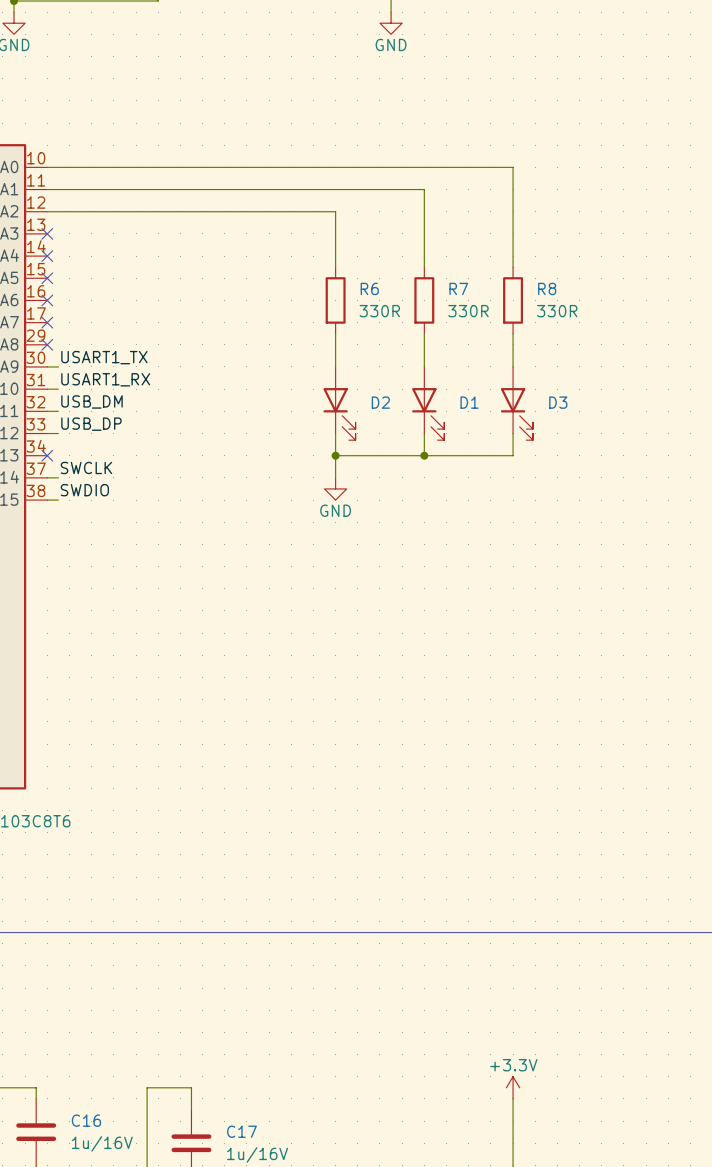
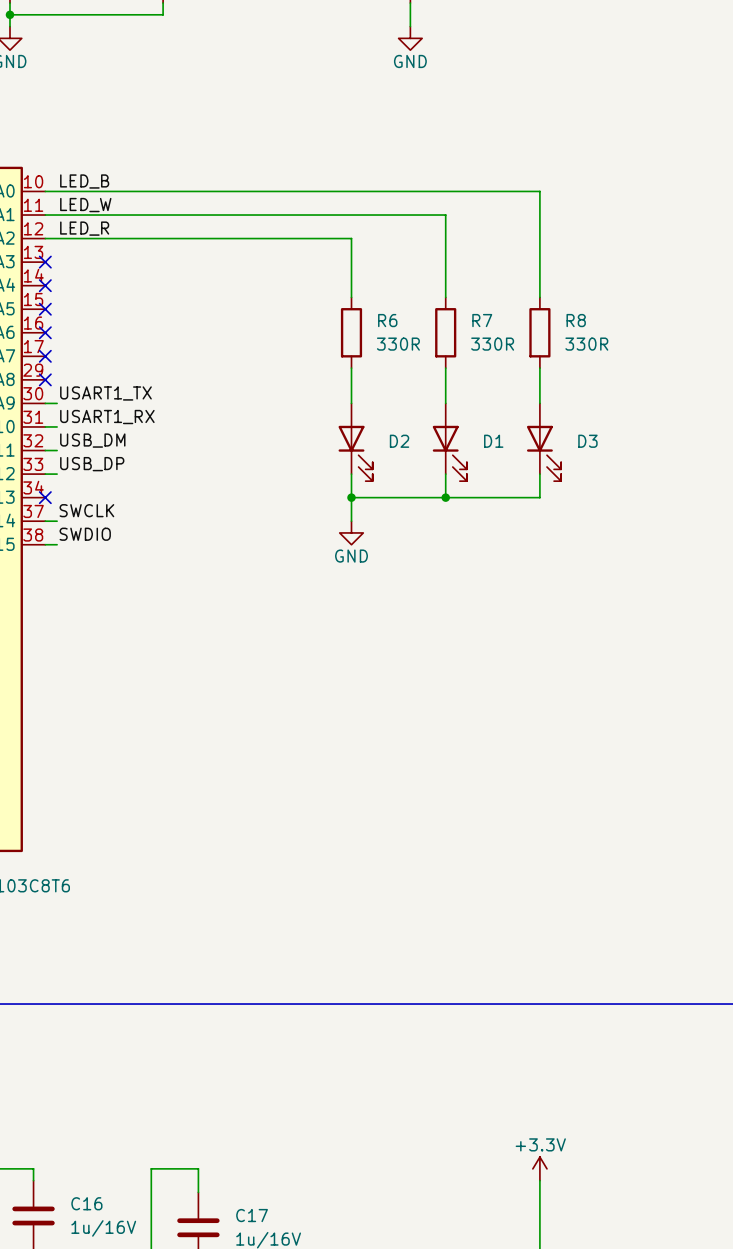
label: none -> LED_B (84, 181)
label: none -> LED_W (85, 205)
label: none -> LED_R (84, 228)

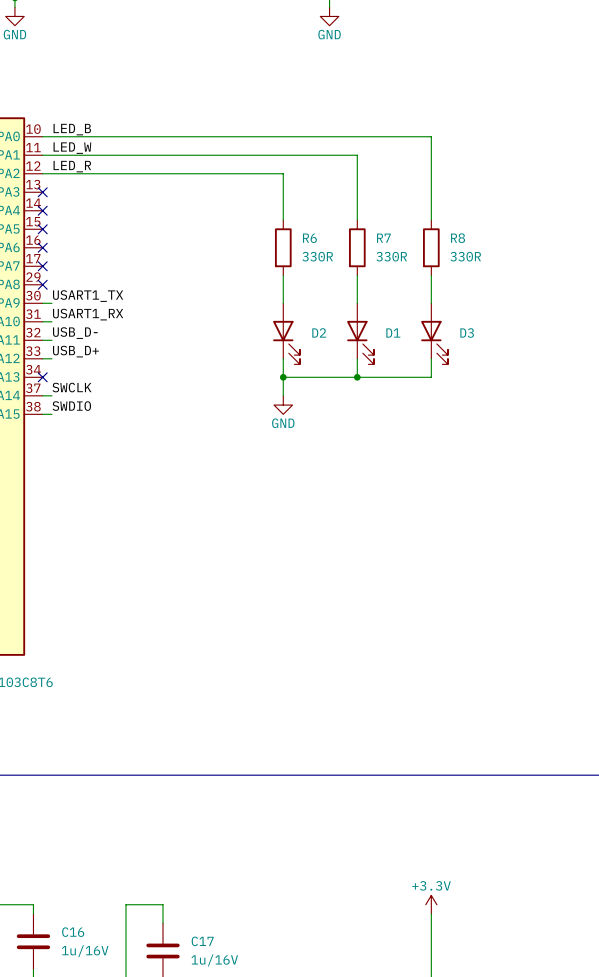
label: USB_DM (92, 440) -> USB_D- (75, 333)
label: USB_DP (92, 464) -> USB_D+ (75, 351)

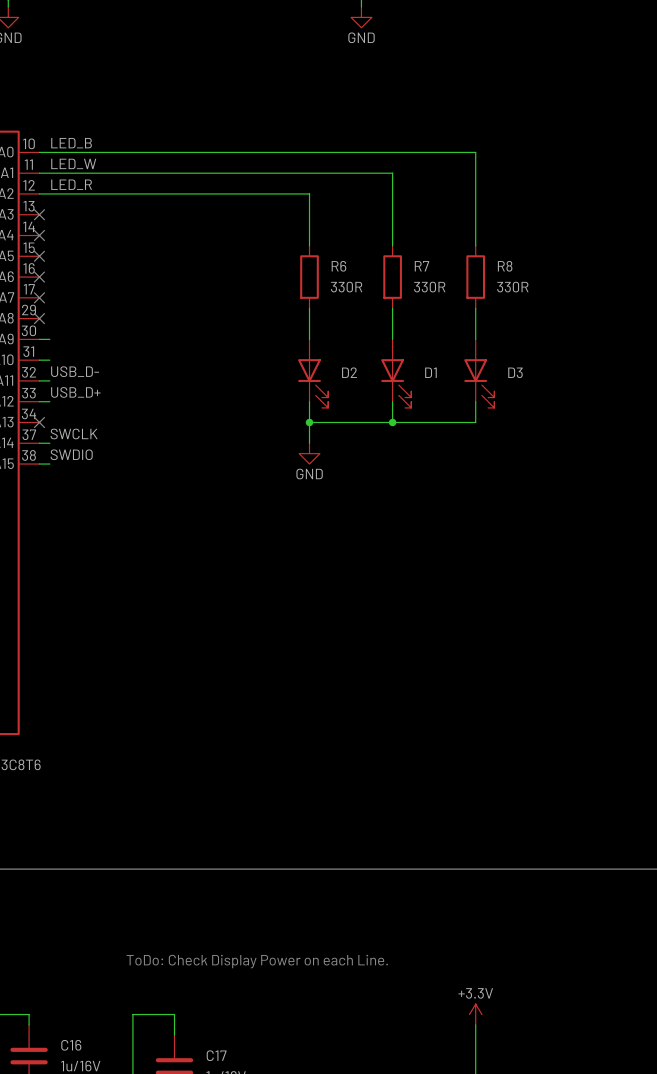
label: USART1_TX (88, 296) -> none
label: USART1_RX (88, 314) -> none
text: none -> ToDo: Check Display Power on each Line. (257, 961)

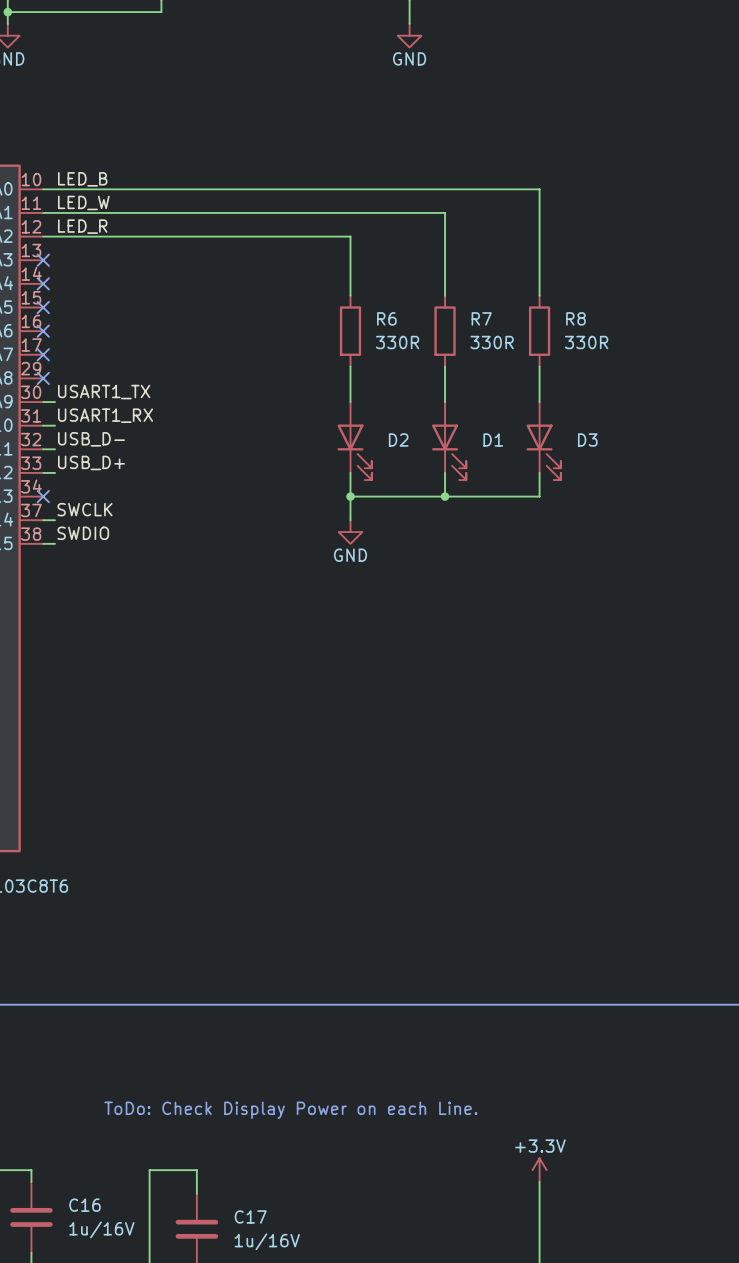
label: none -> USART1_TX (104, 392)
label: none -> USART1_RX (105, 415)

